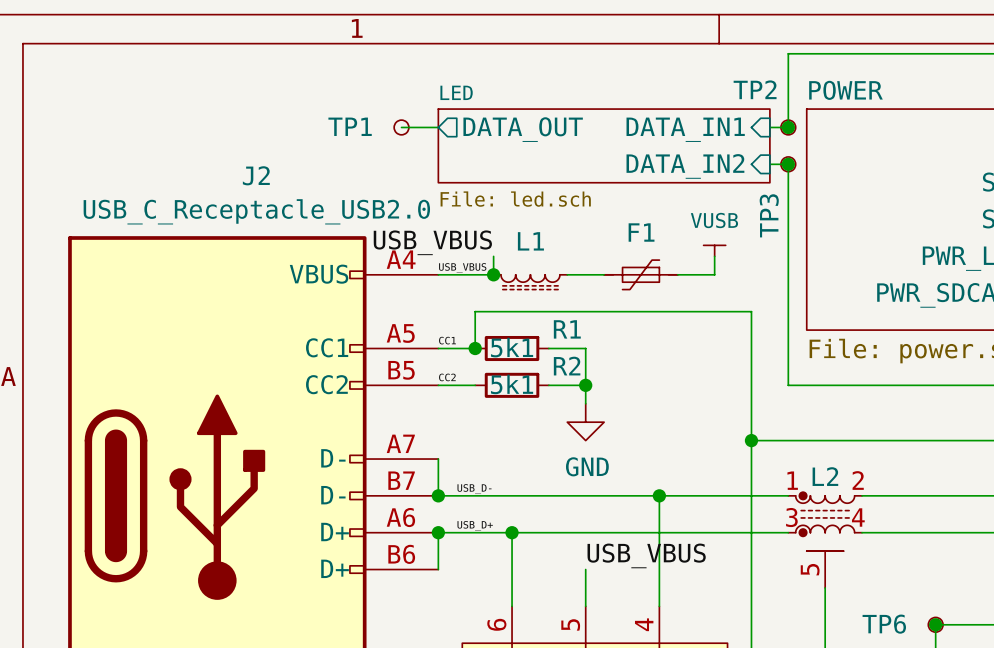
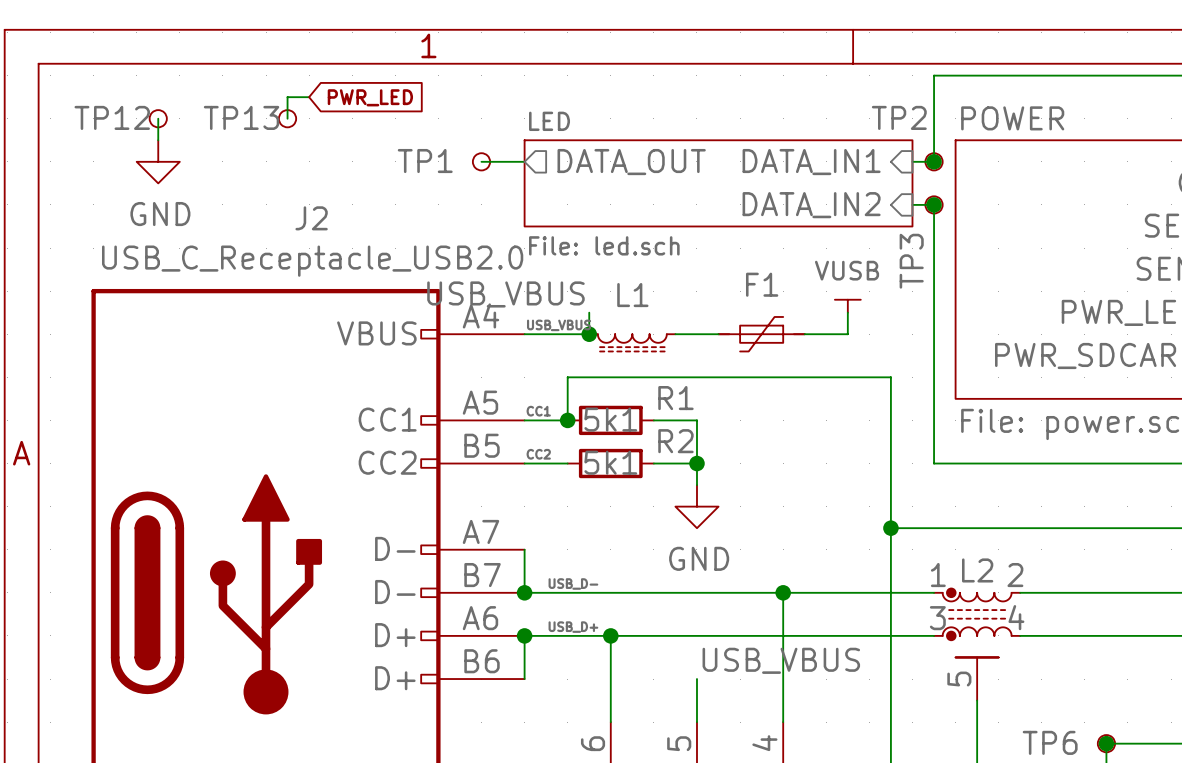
wire: none -> (309, 97) (287, 97) (287, 118)
global label: none -> PWR_LED (370, 97)
wire: none -> (158, 118) (158, 140)
TP12: none -> (158, 118)
TP13: none -> (287, 118)
power symbol: none -> GND (158, 161)

